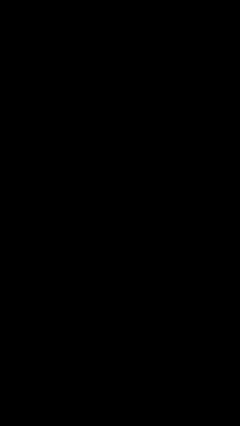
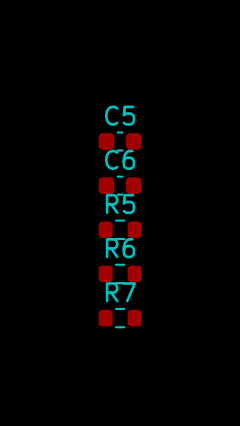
C5: none -> (120, 141)
C6: none -> (120, 185)
R5: none -> (120, 229)
R6: none -> (120, 273)
R7: none -> (120, 318)

